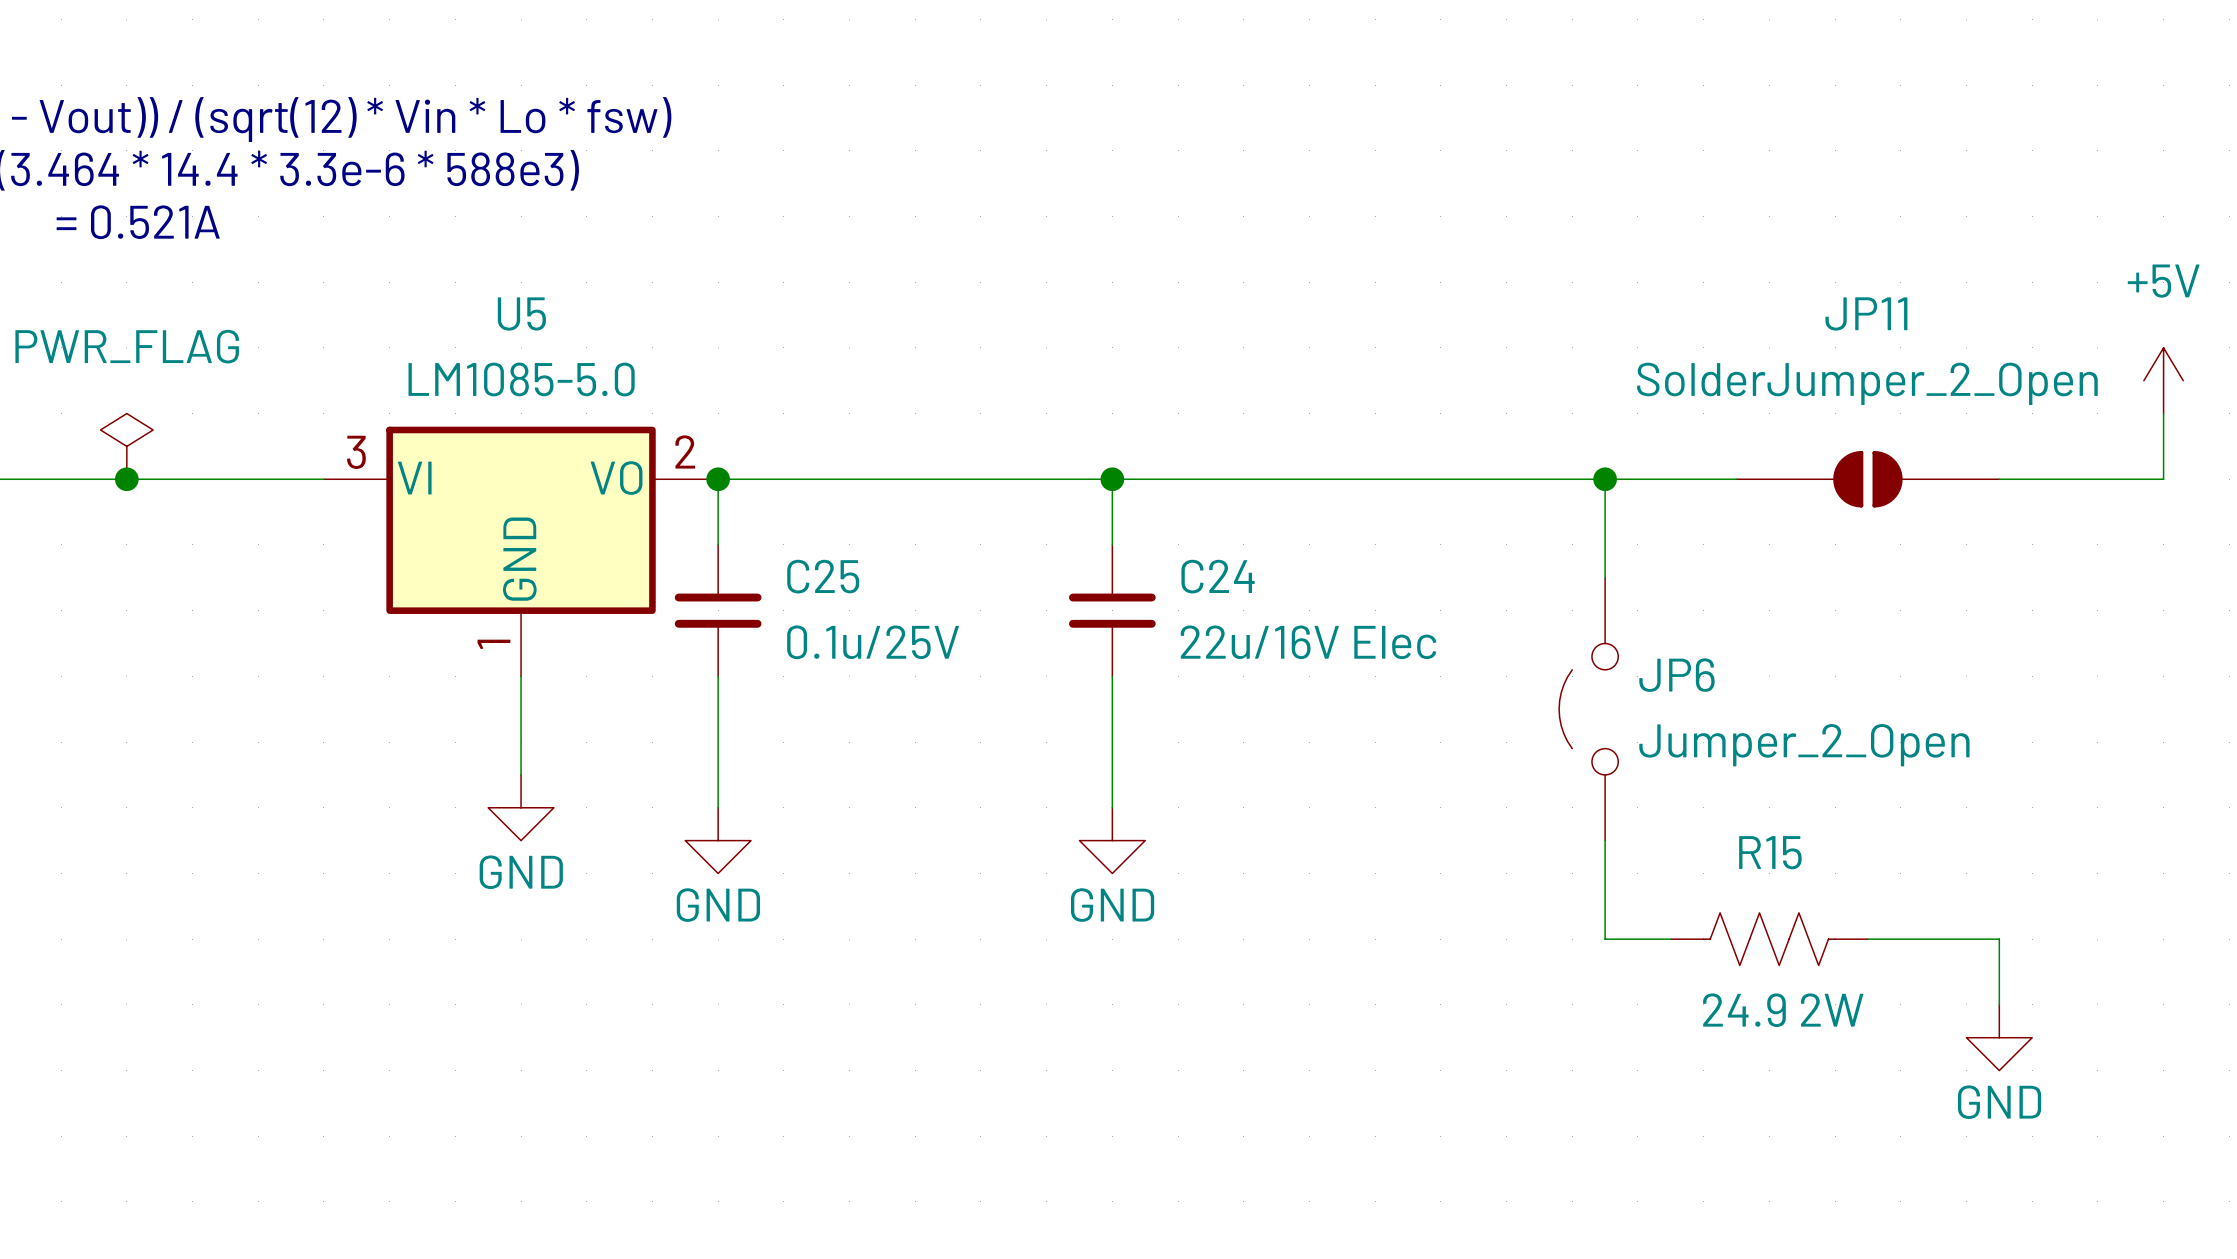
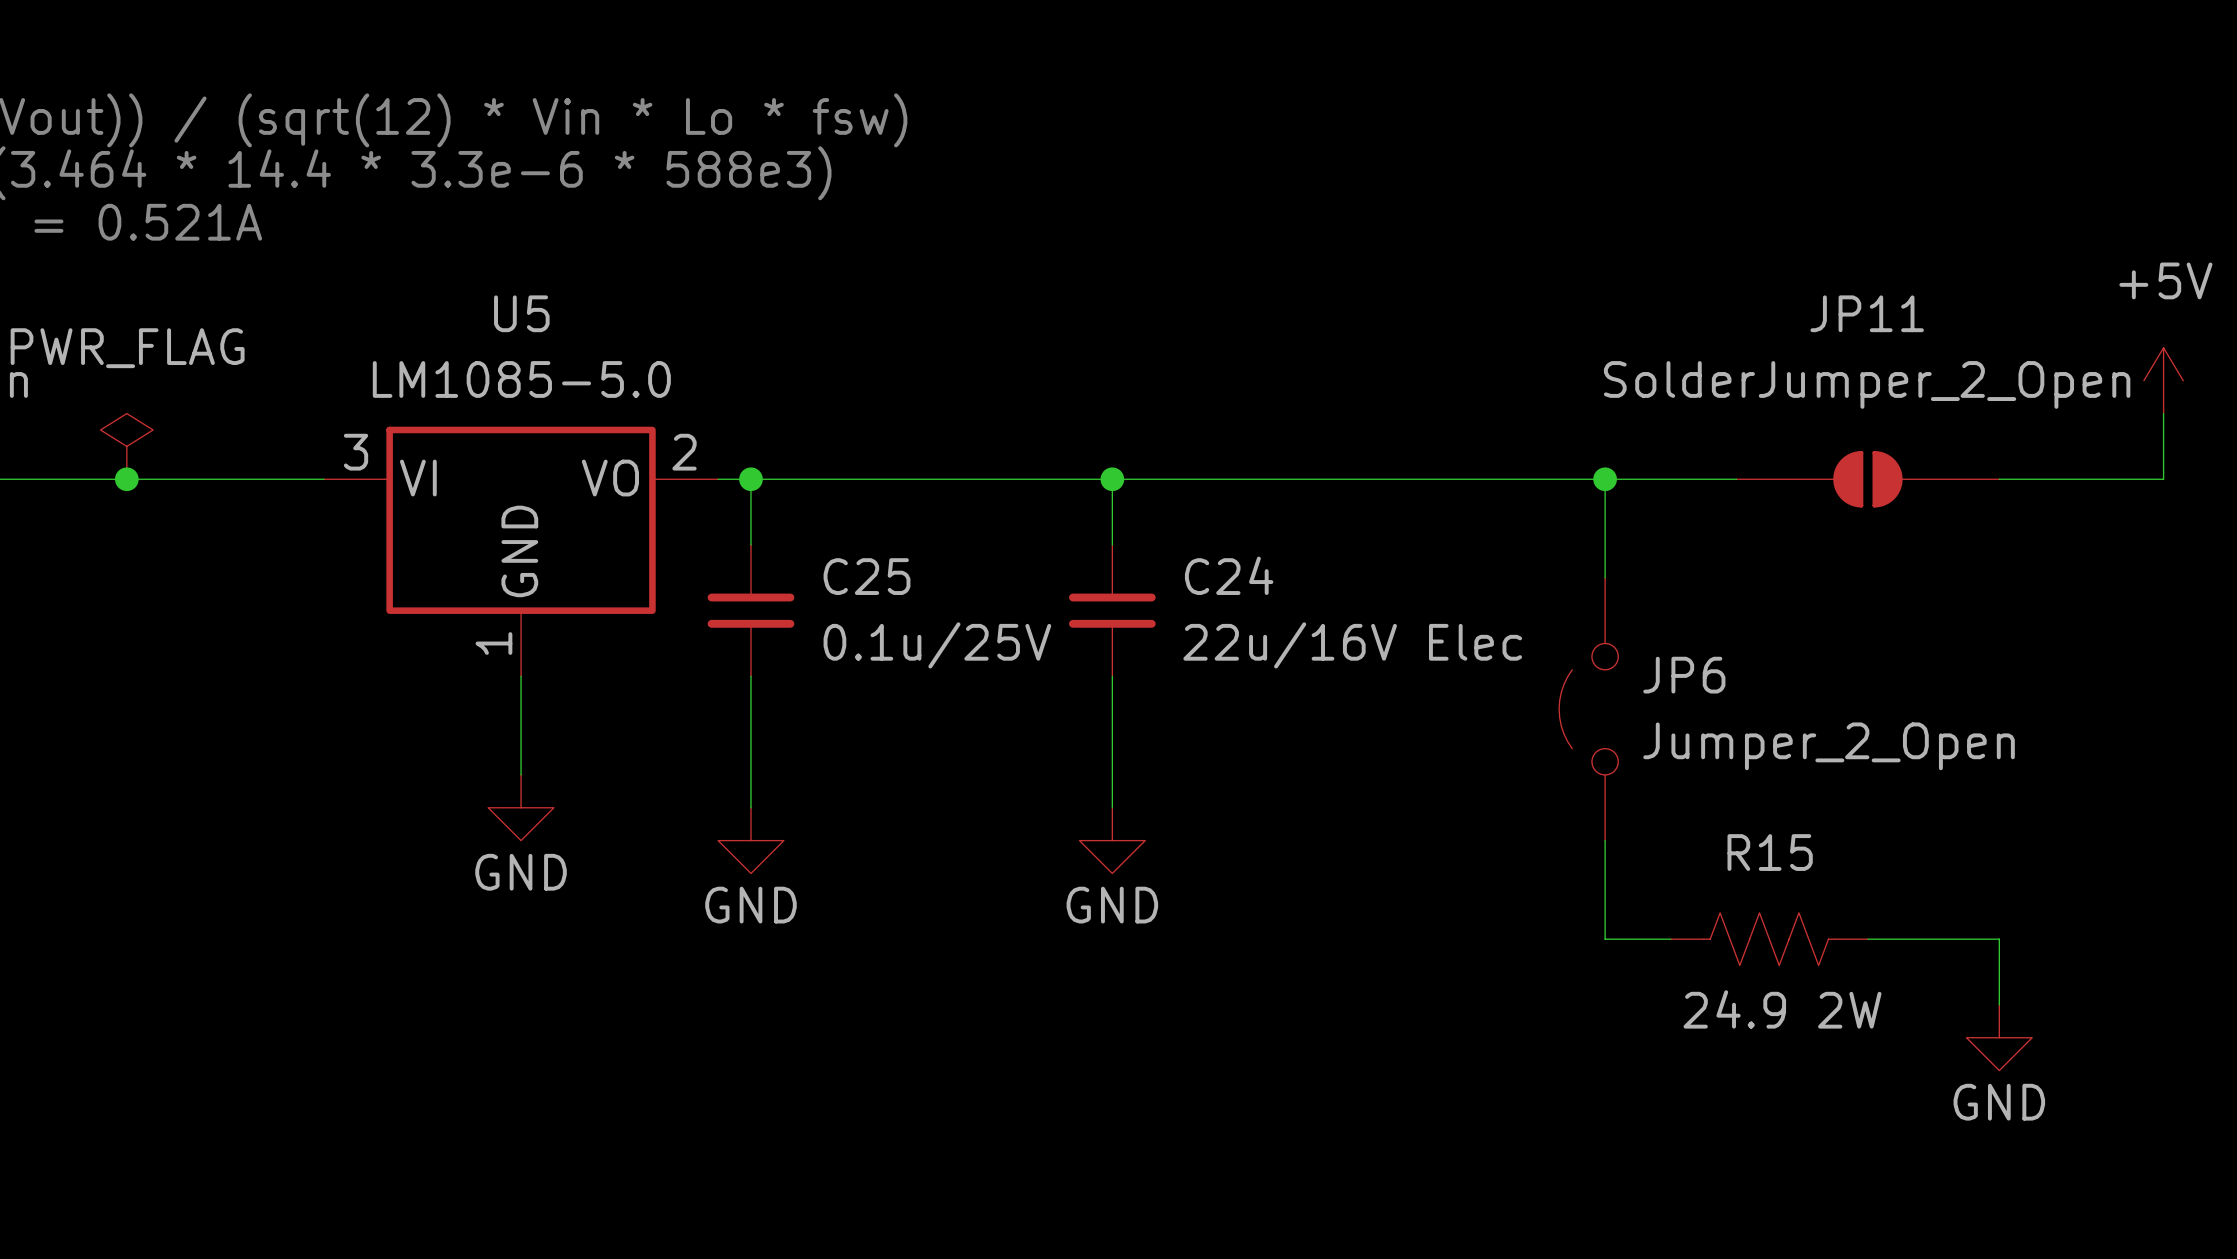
wire: (718, 479) (718, 544) -> (750, 479) (750, 544)
junction position: (718, 479) -> (750, 479)
C25 position: (718, 610) -> (750, 610)
wire: (718, 676) (718, 807) -> (750, 676) (750, 807)
power symbol position: GND (718, 840) -> GND (750, 840)

